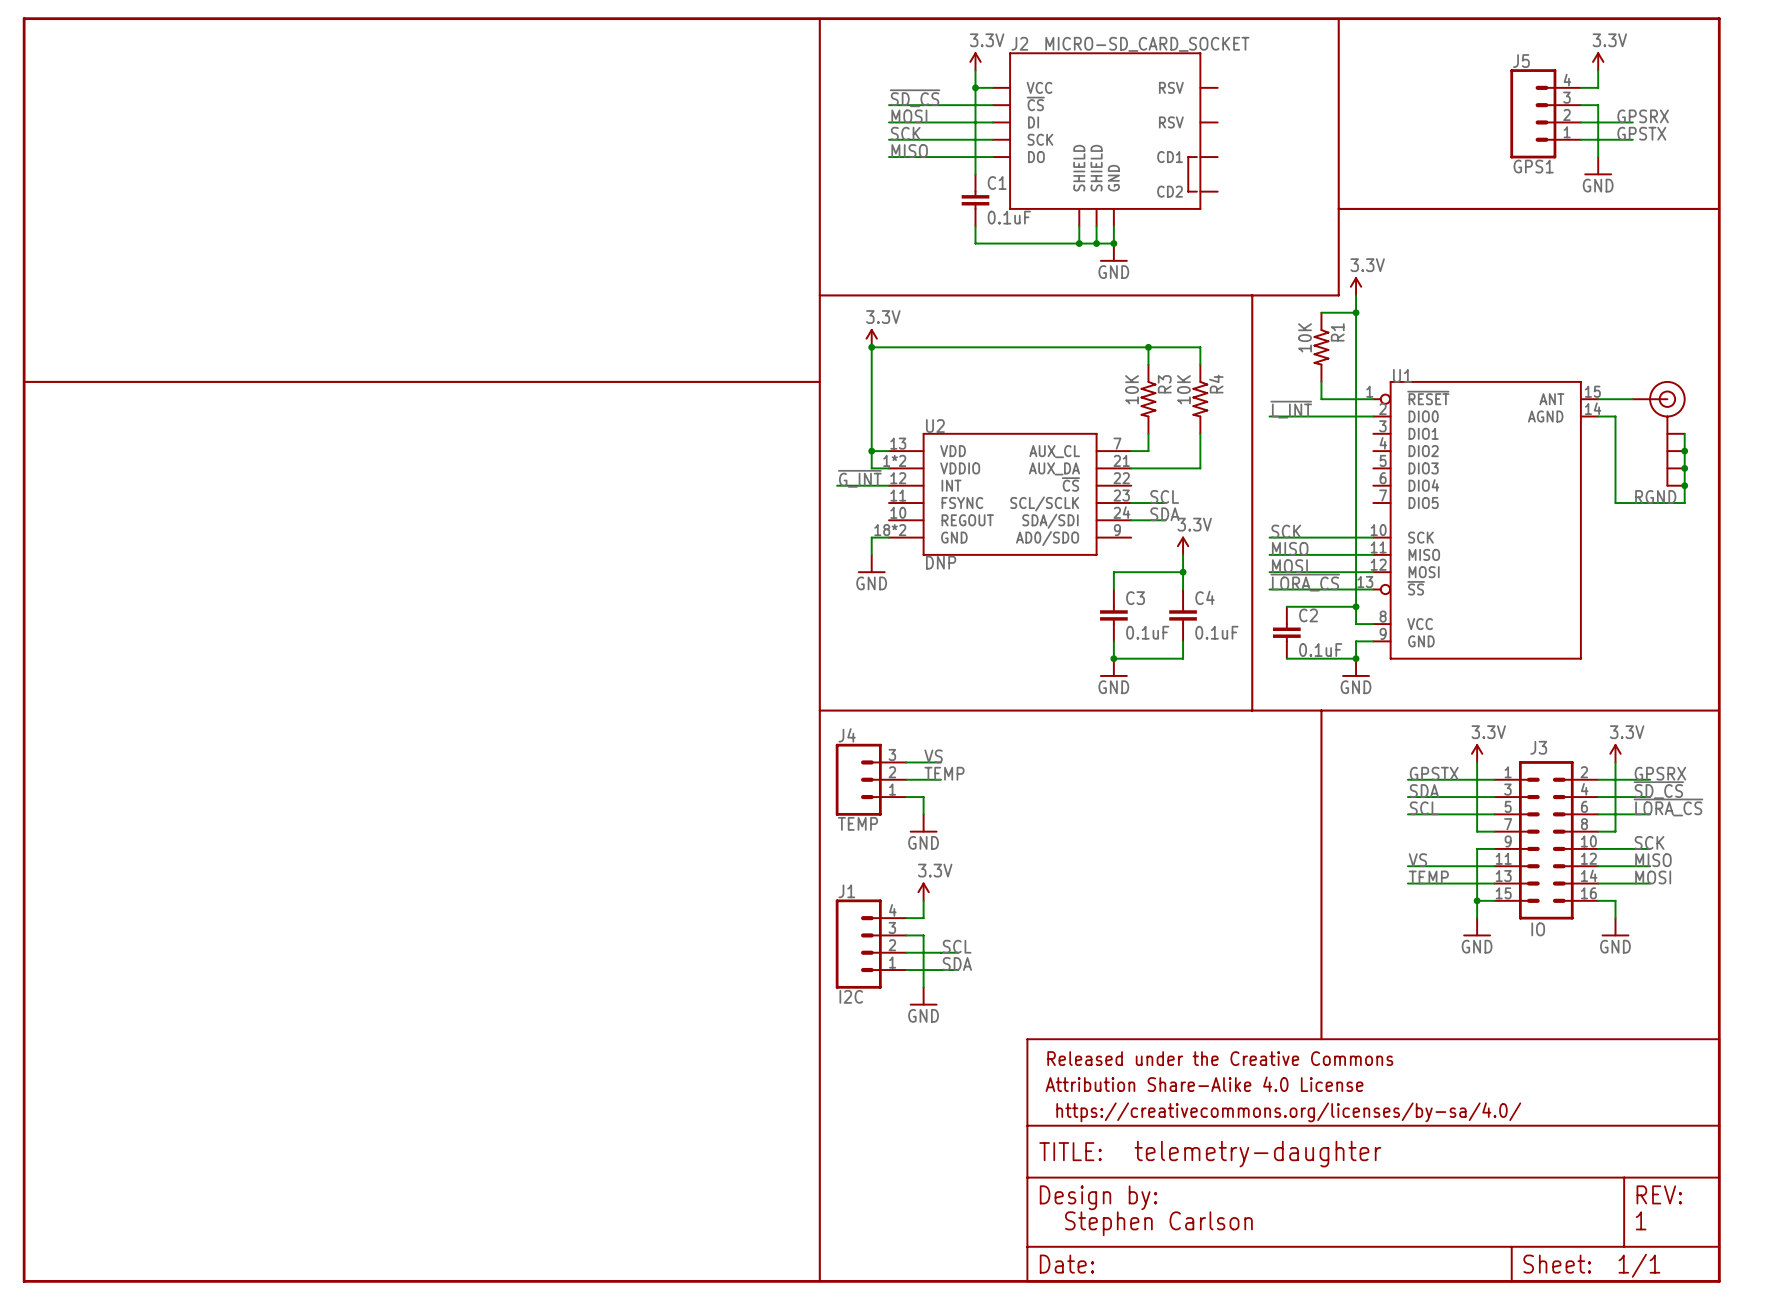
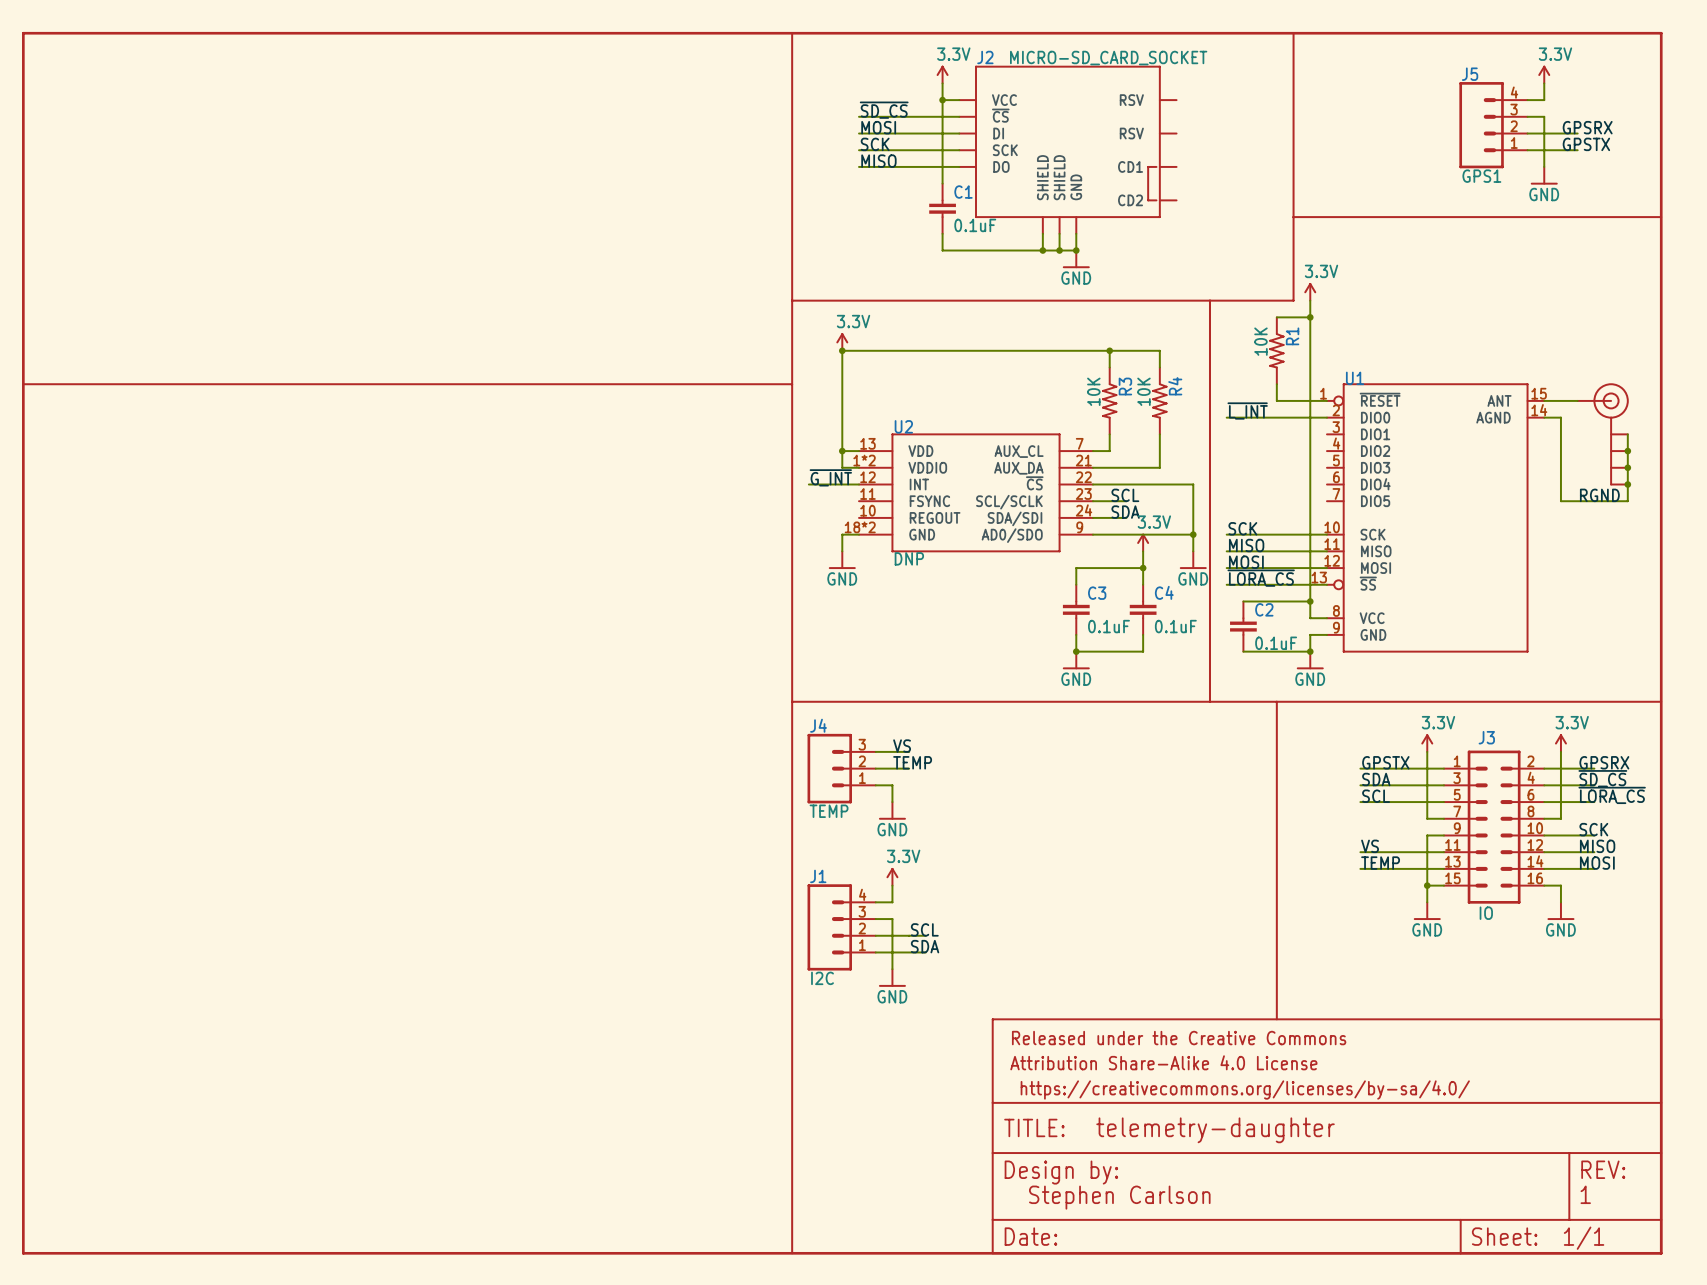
wire: none -> (1092, 484) (1193, 484) (1193, 551)
wire: none -> (1092, 534) (1193, 534)
junction: none -> (1193, 534)
power symbol: none -> GND (1193, 560)

